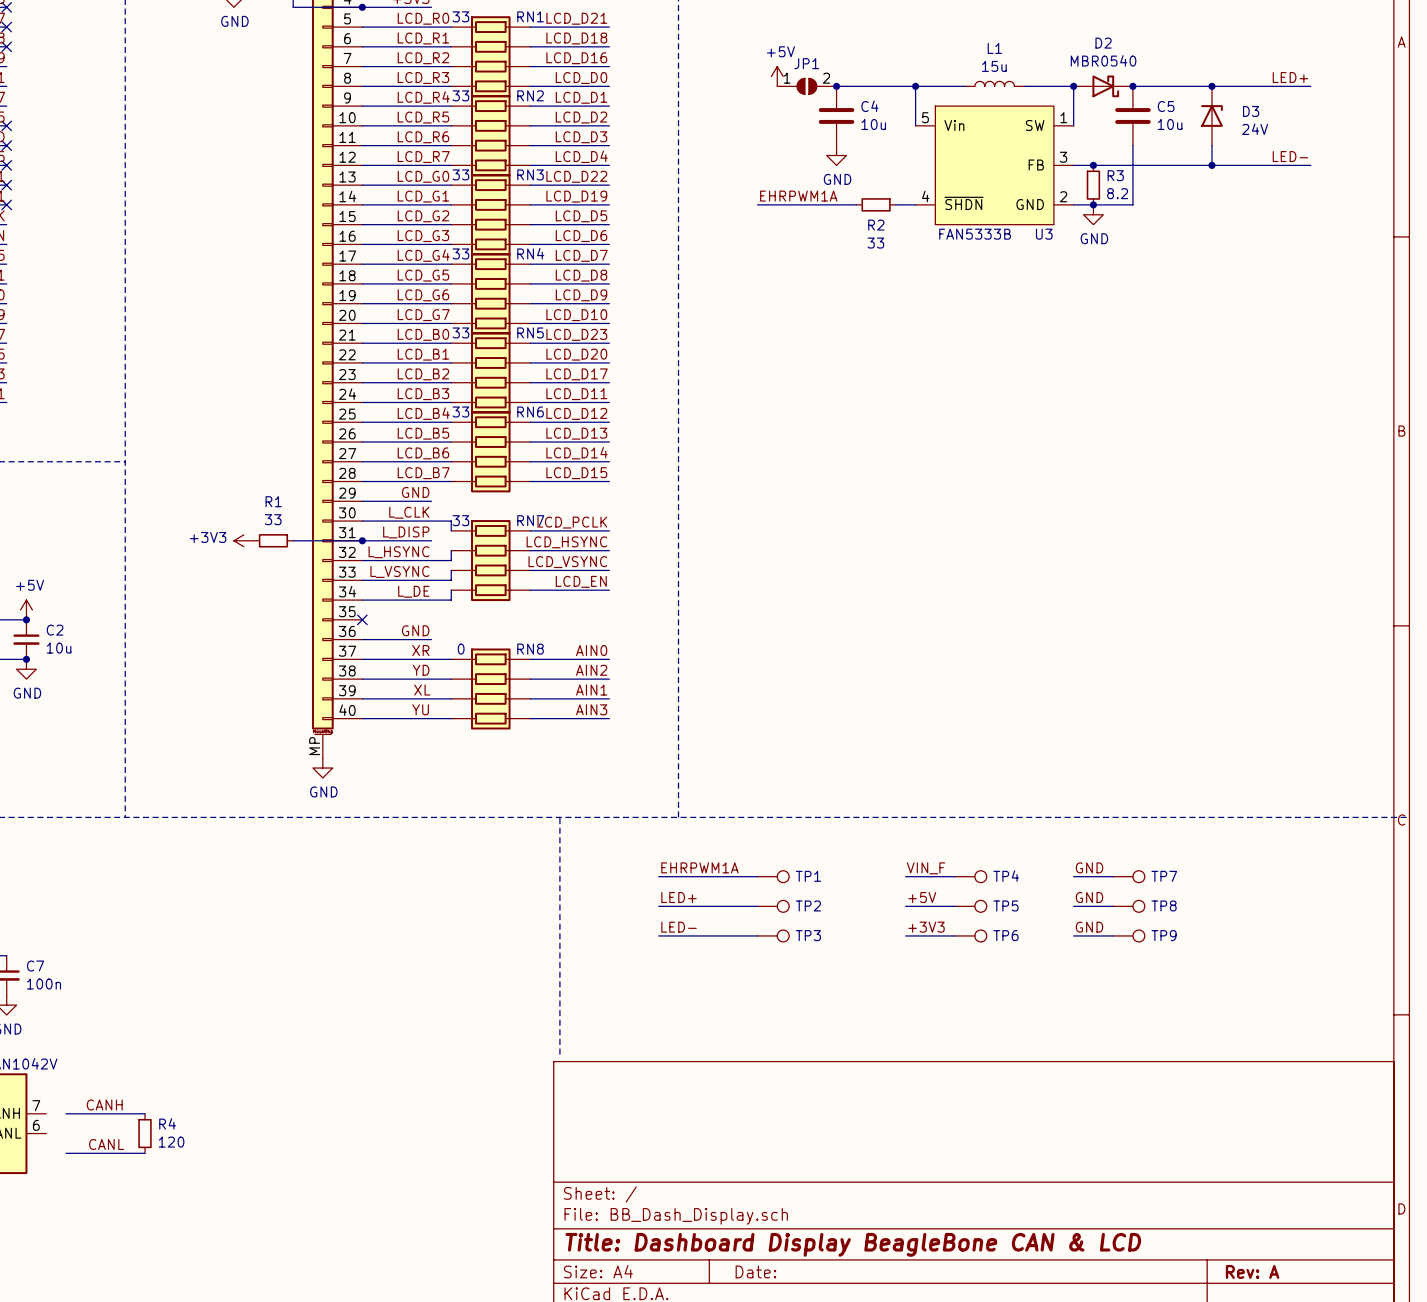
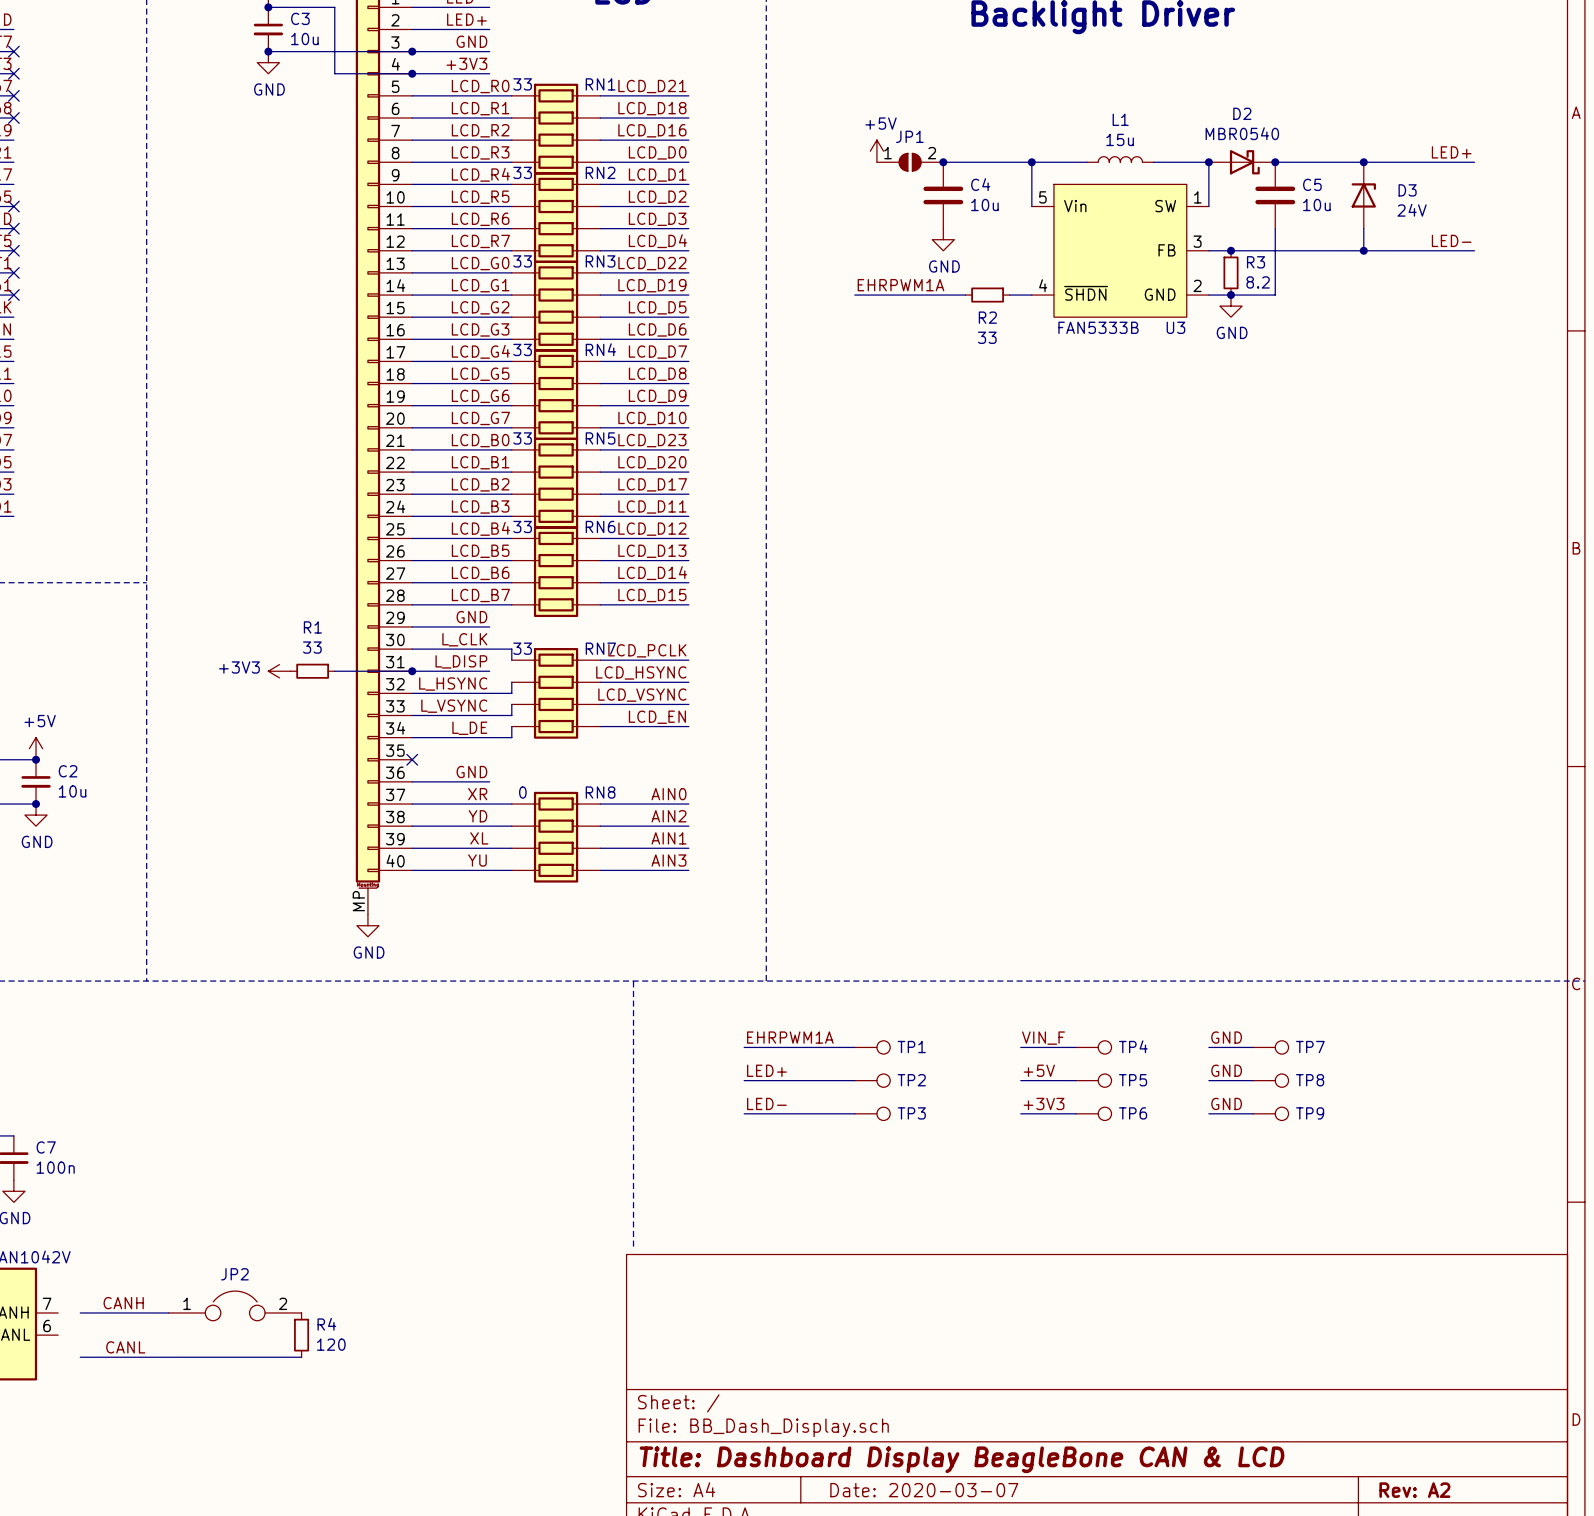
JP2: none -> (235, 1305)
R4 position: (145, 1133) -> (301, 1335)
wire: none -> (168, 1357) (301, 1357)
title block: Date: (755, 1271) -> Date: 2020-03-07 (924, 1490)
title block: Rev: A (1252, 1271) -> Rev: A2 (1414, 1490)

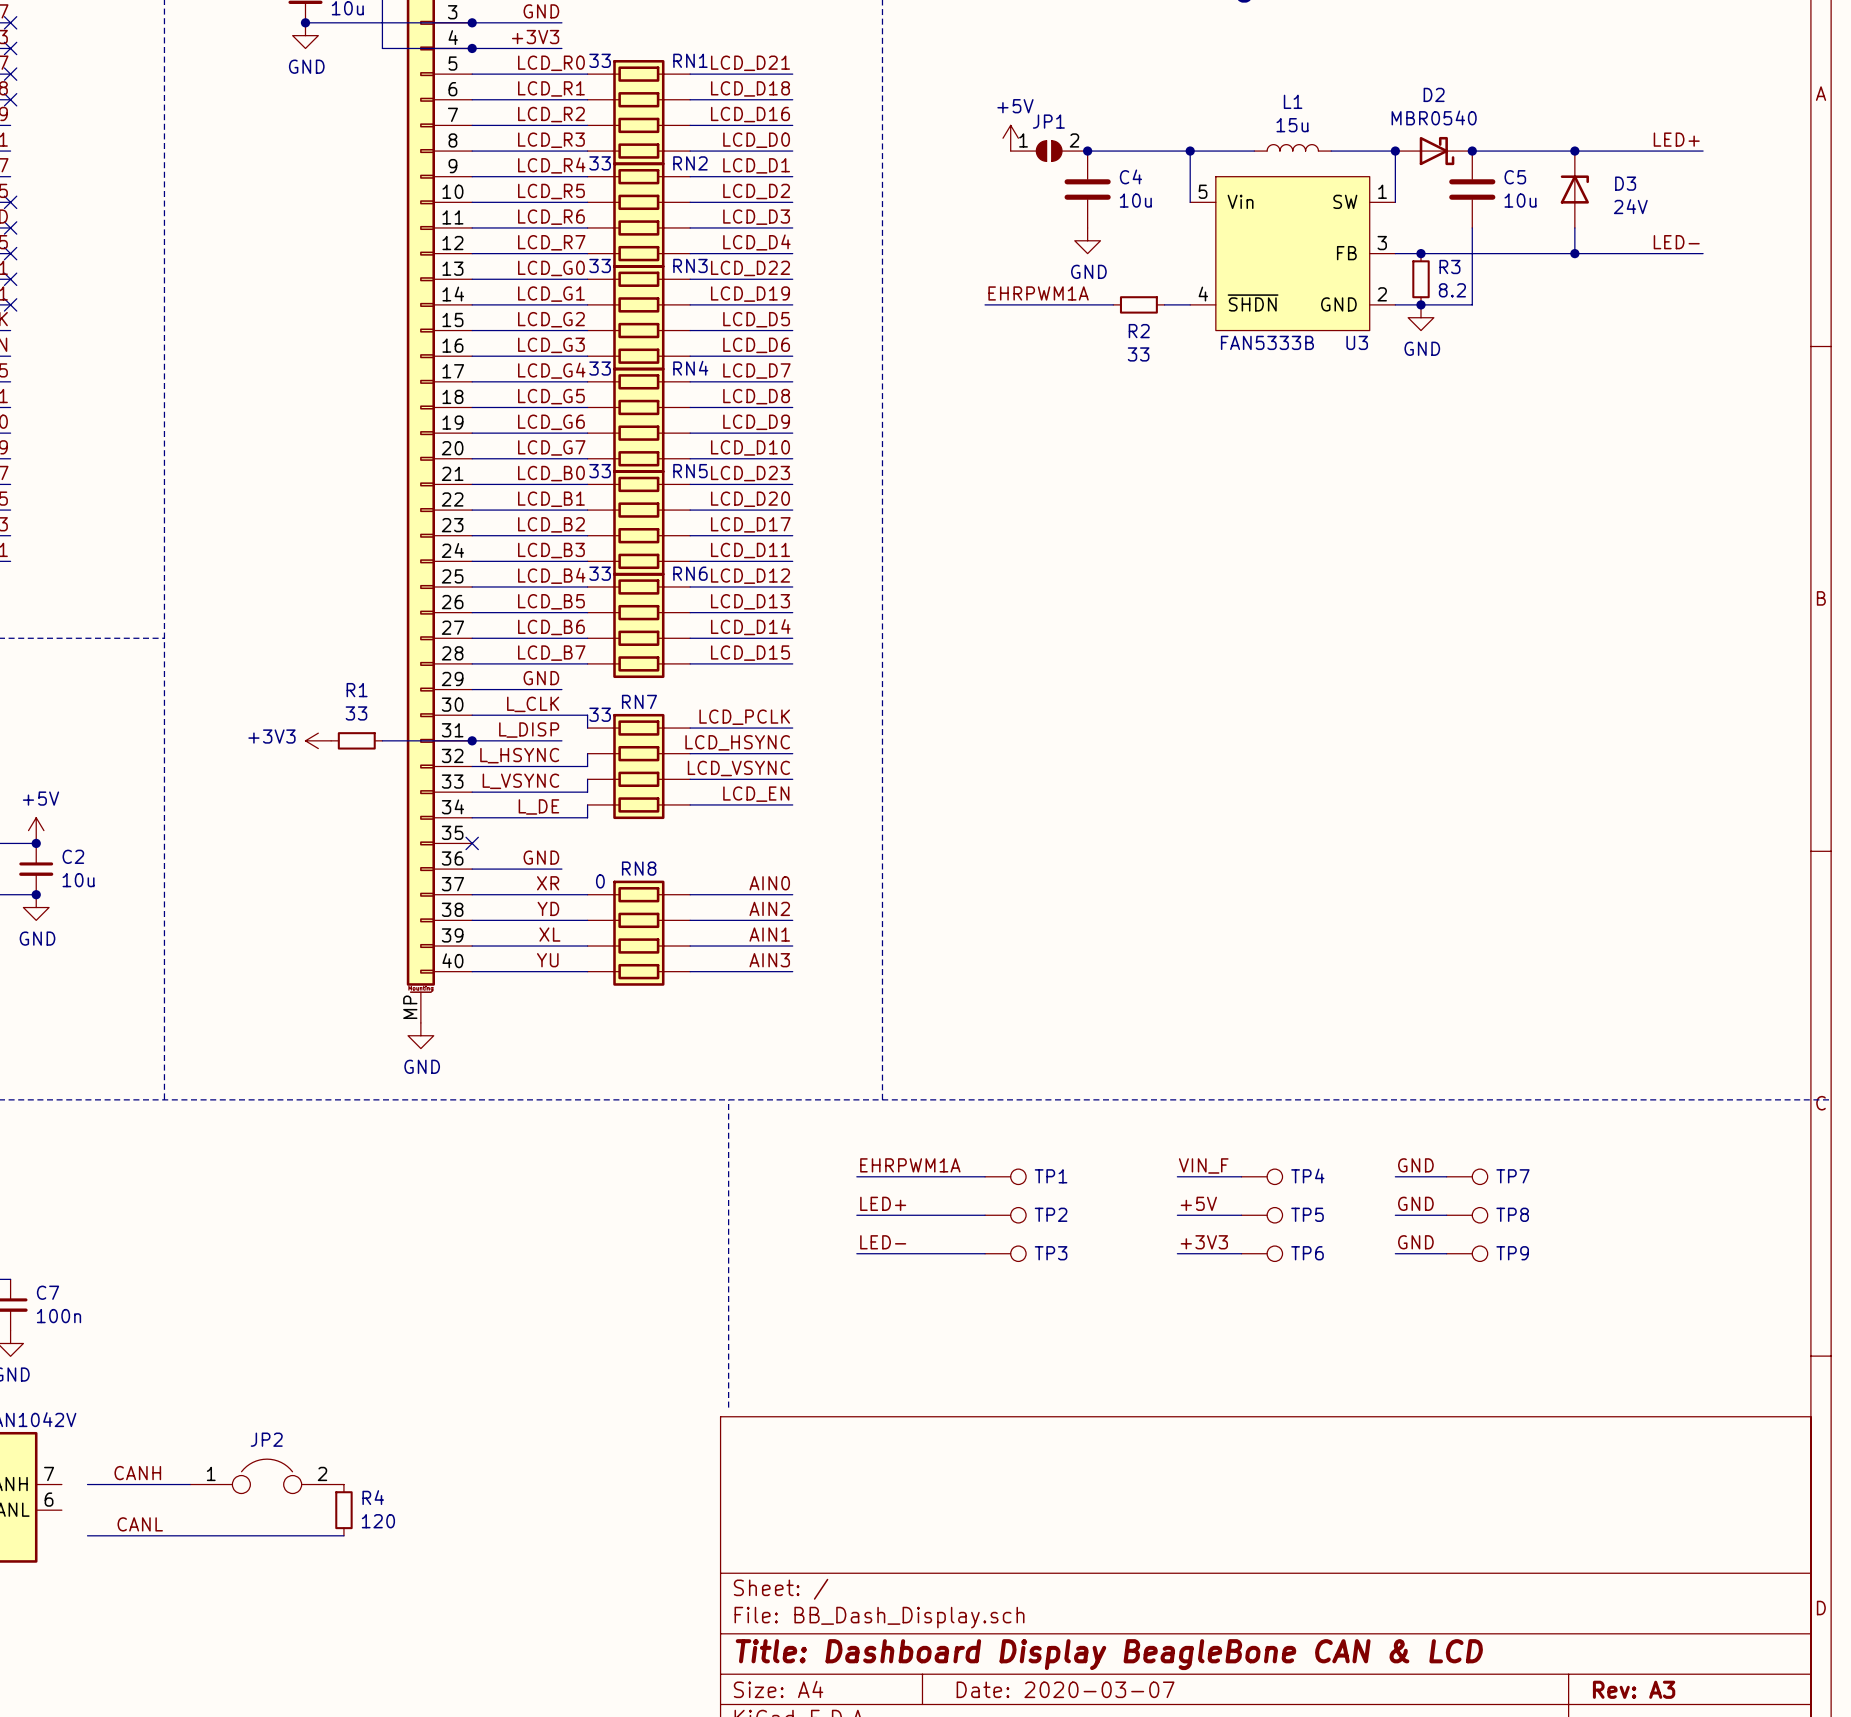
RN7 name position: RN7 (600, 648) -> RN7 (639, 701)
RN8 name position: RN8 (600, 792) -> RN8 (639, 868)
title block: Rev: A2 (1414, 1490) -> Rev: A3 (1634, 1689)

